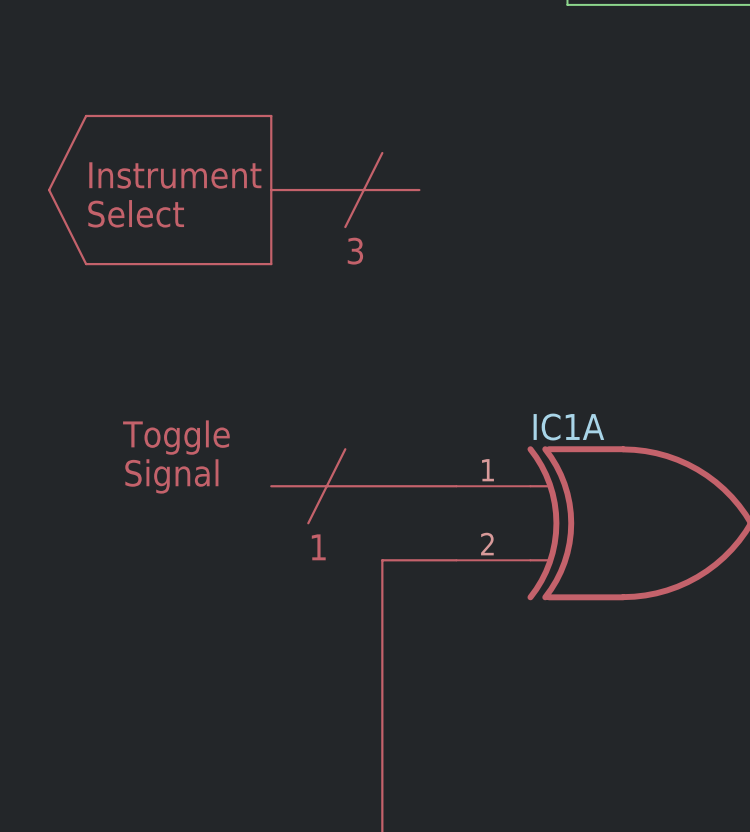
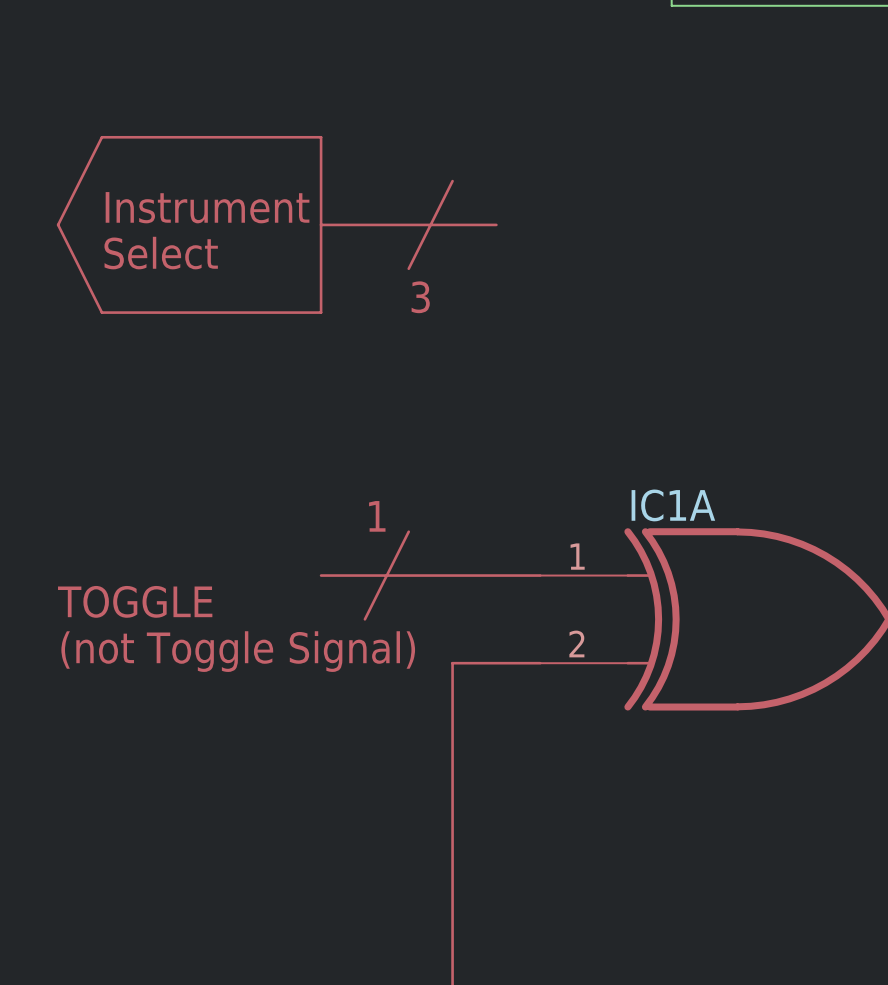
text: Toggle (176, 437) -> none
text: Signal (171, 476) -> none
text: none -> TOGGLE (135, 601)
text position: 1 (318, 547) -> 1 (377, 516)
text: none -> (not Toggle Signal) (238, 651)

